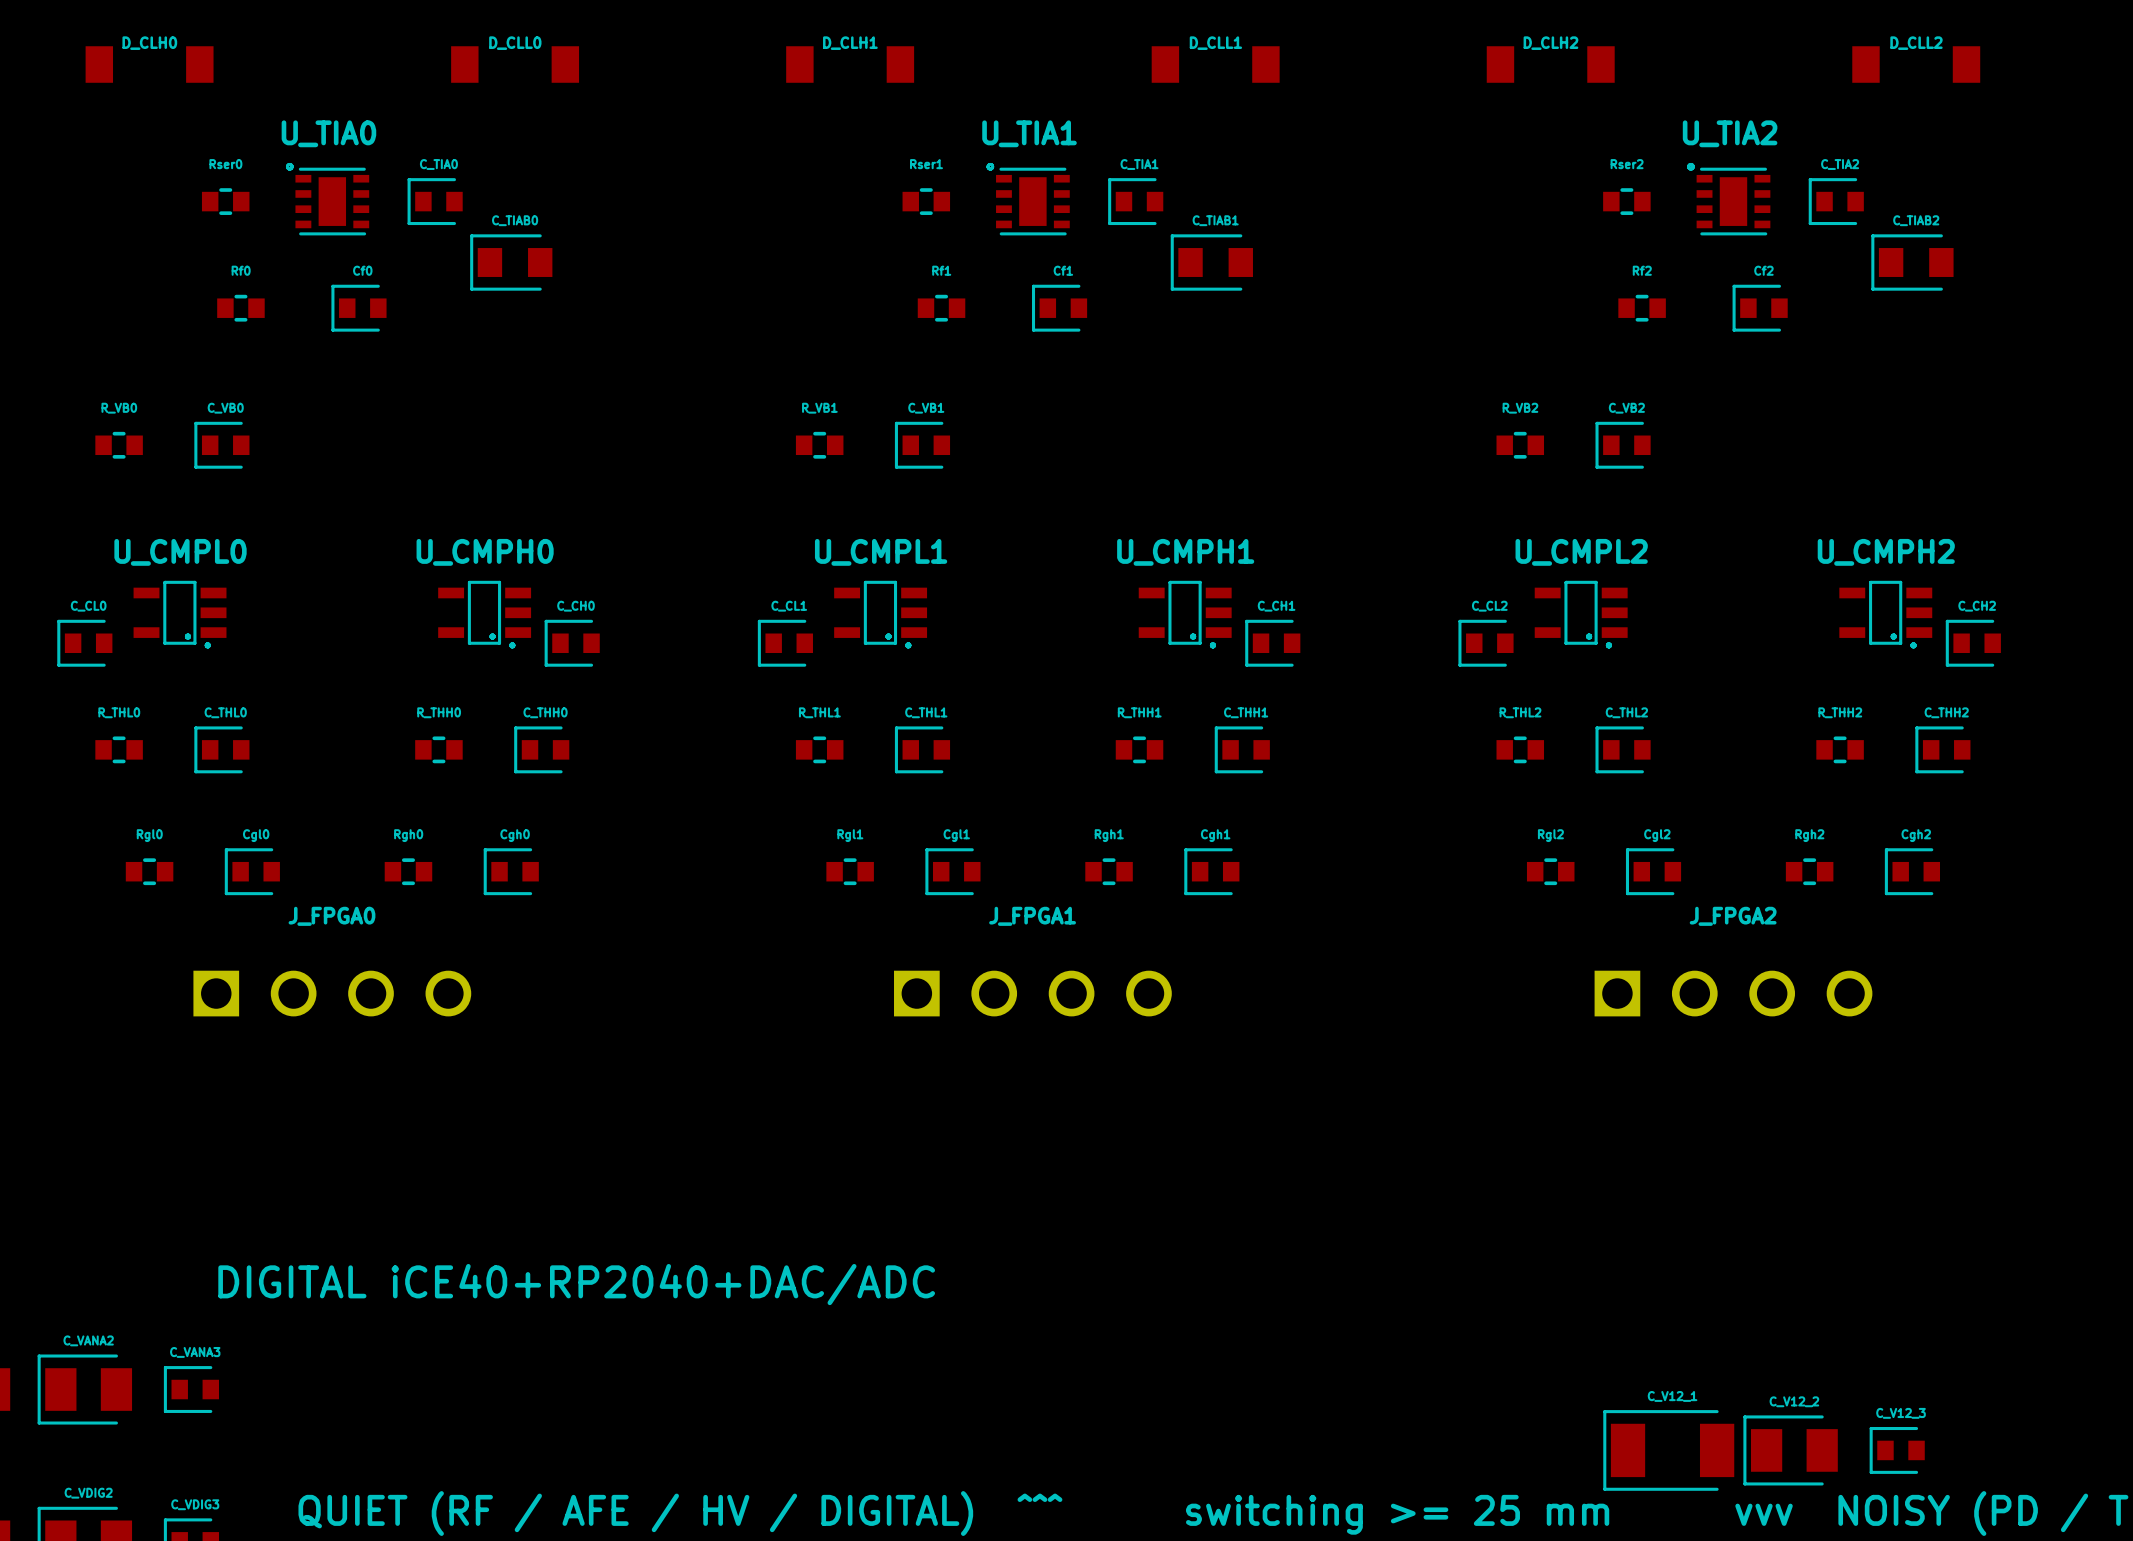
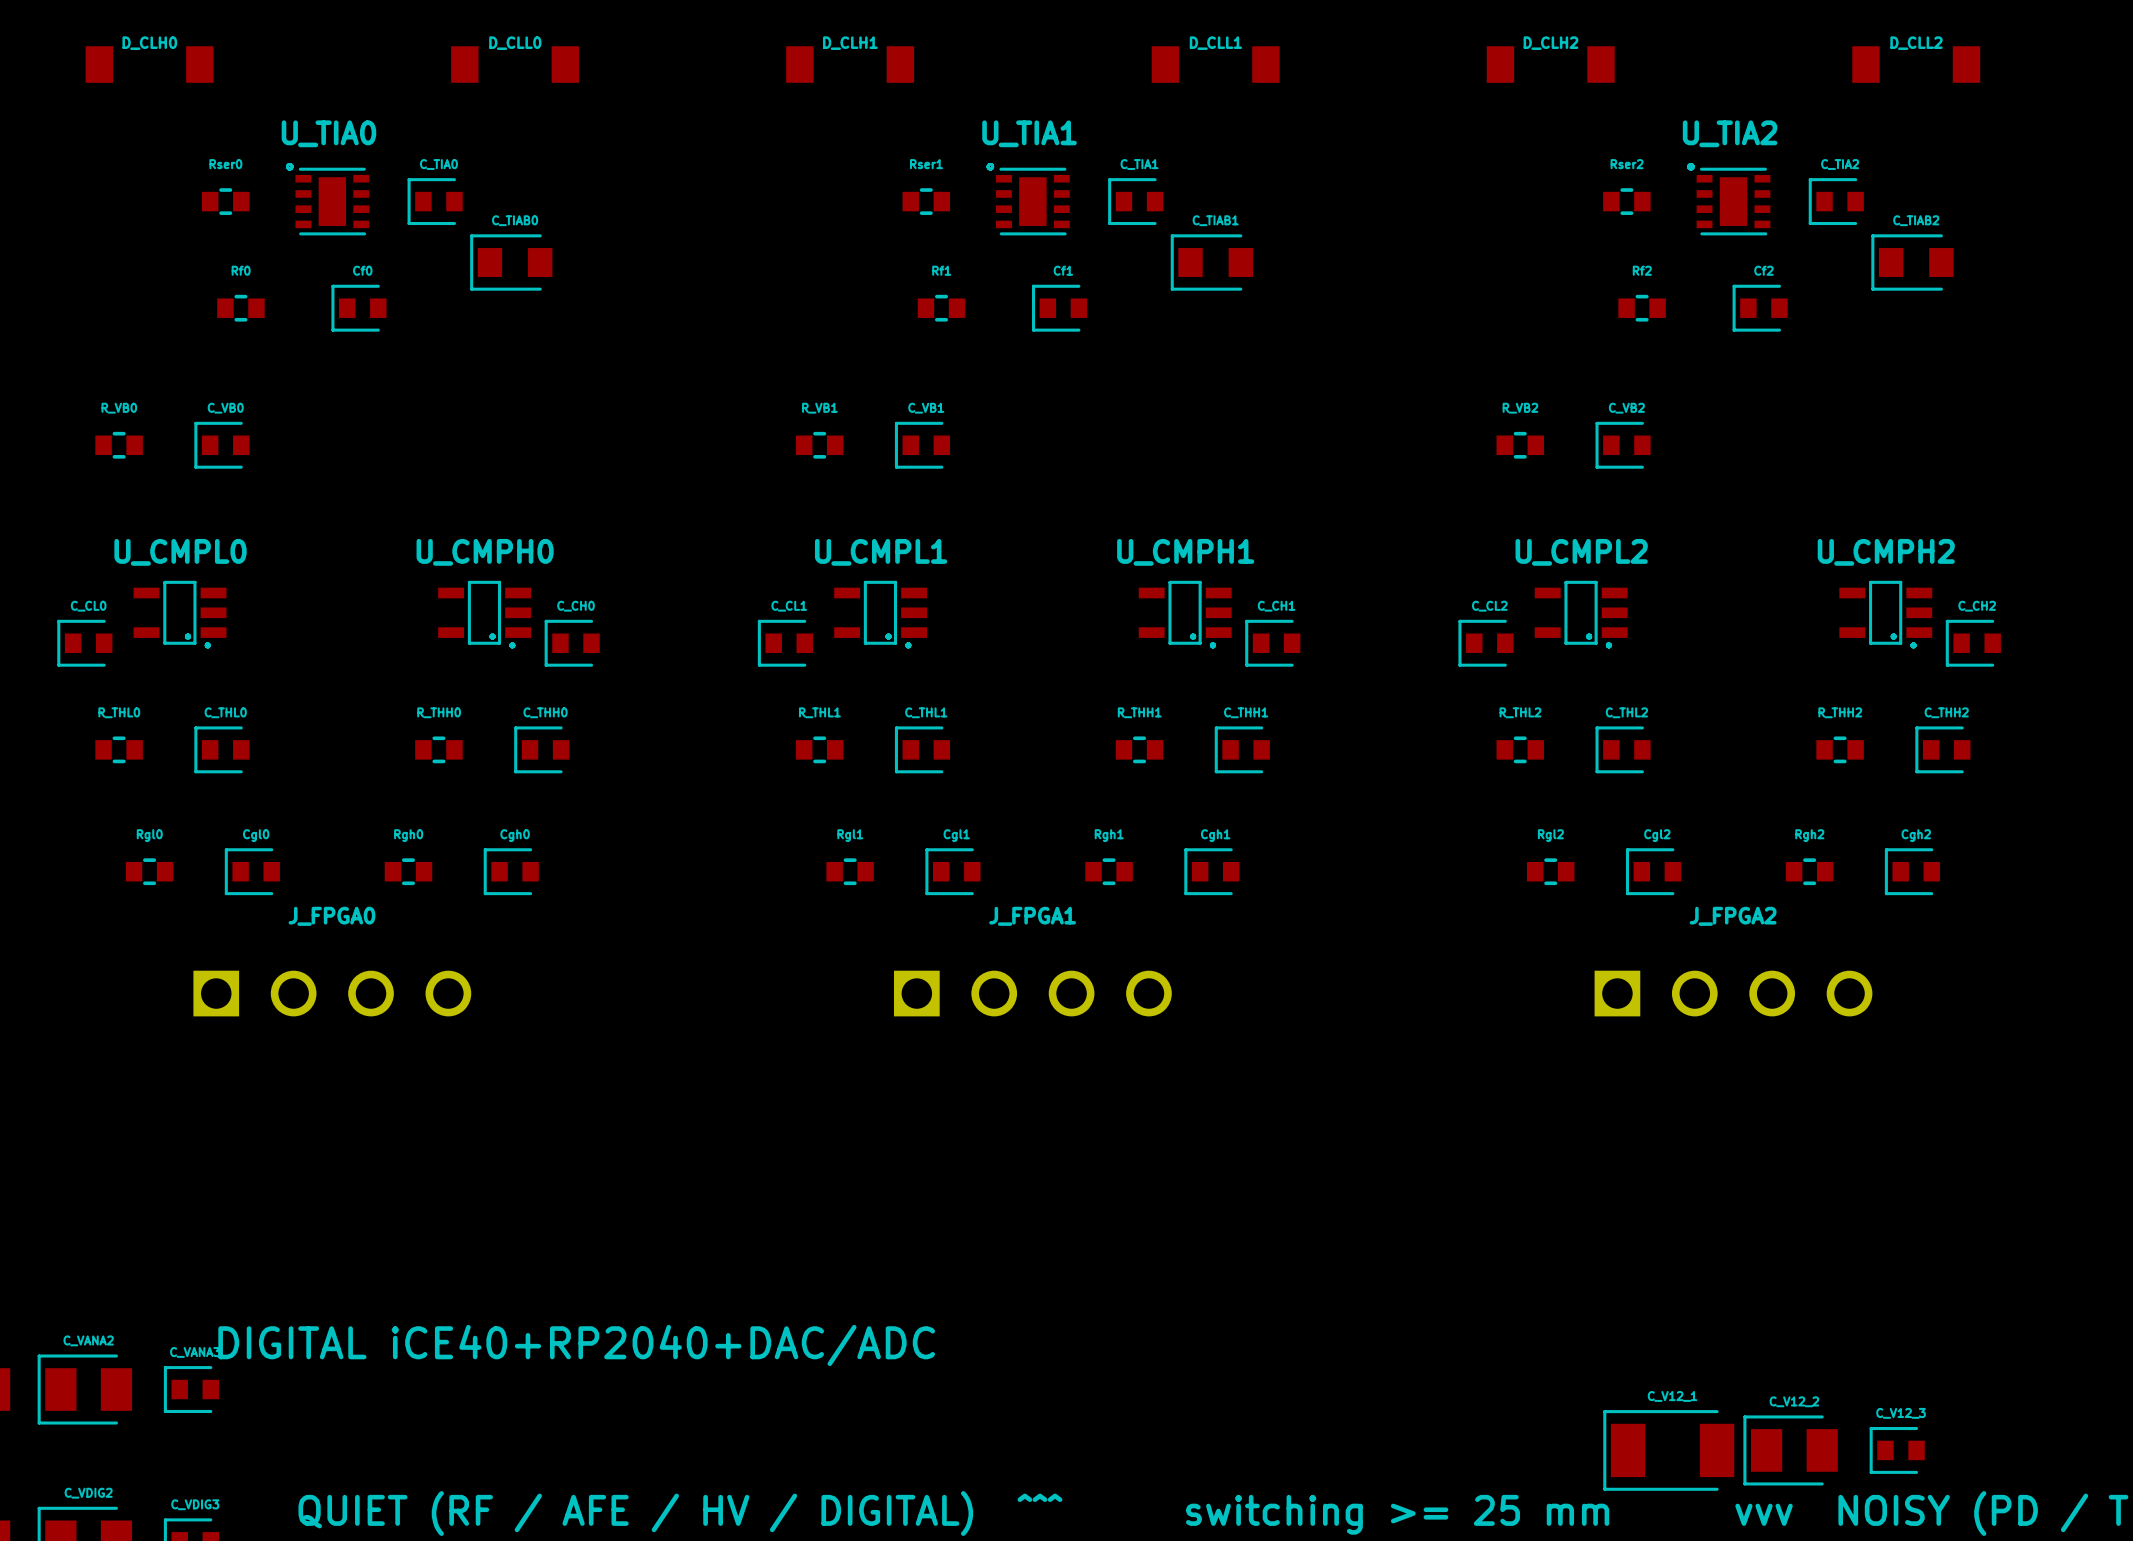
text position: DIGITAL iCE40+RP2040+DAC/ADC (576, 1284) -> DIGITAL iCE40+RP2040+DAC/ADC (576, 1345)

